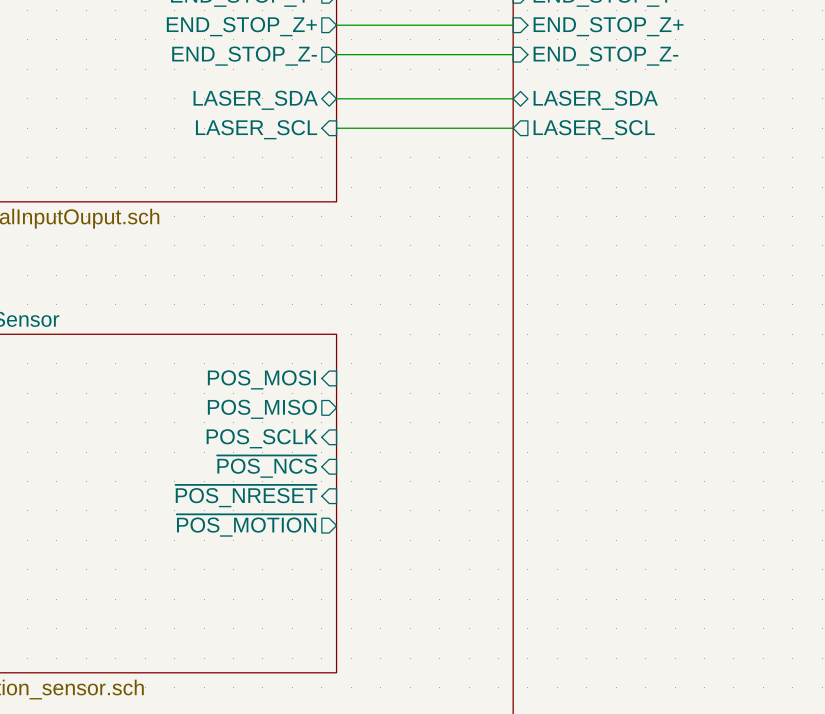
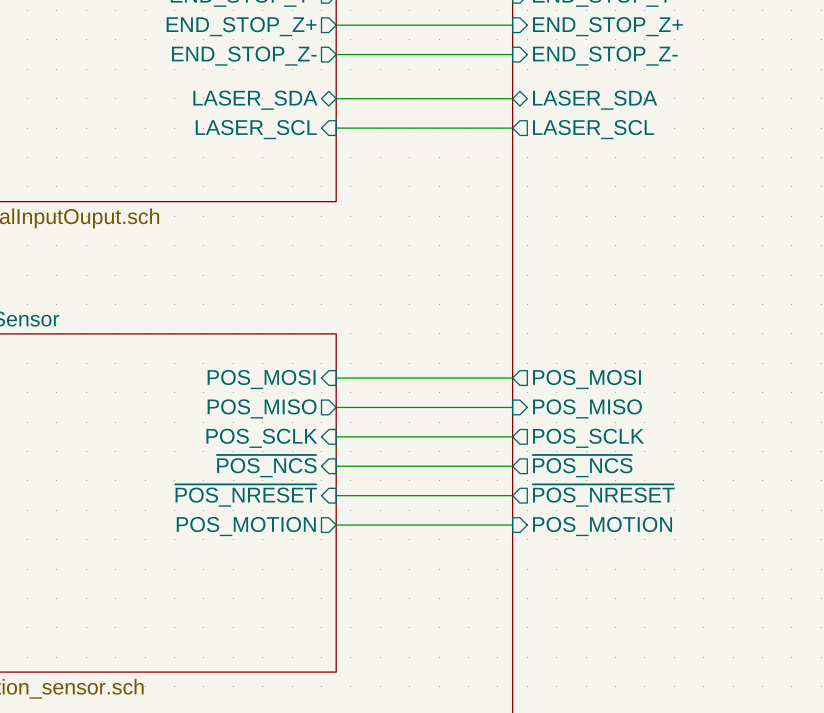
wire: none -> (336, 378) (512, 378)
sheet pin: none -> POS_MOSI (586, 379)
wire: none -> (336, 407) (512, 407)
sheet pin: none -> POS_MISO (587, 408)
wire: none -> (336, 436) (512, 436)
sheet pin: none -> POS_SCLK (588, 438)
wire: none -> (336, 466) (512, 466)
sheet pin: none -> ~{POS_NCS} (582, 466)
wire: none -> (336, 495) (512, 495)
sheet pin: none -> ~{POS_NRESET} (603, 495)
sheet pin: ~{POS_MOTION} (246, 525) -> POS_MOTION (246, 526)
wire: none -> (336, 525) (512, 525)
sheet pin: none -> POS_MOTION (602, 526)

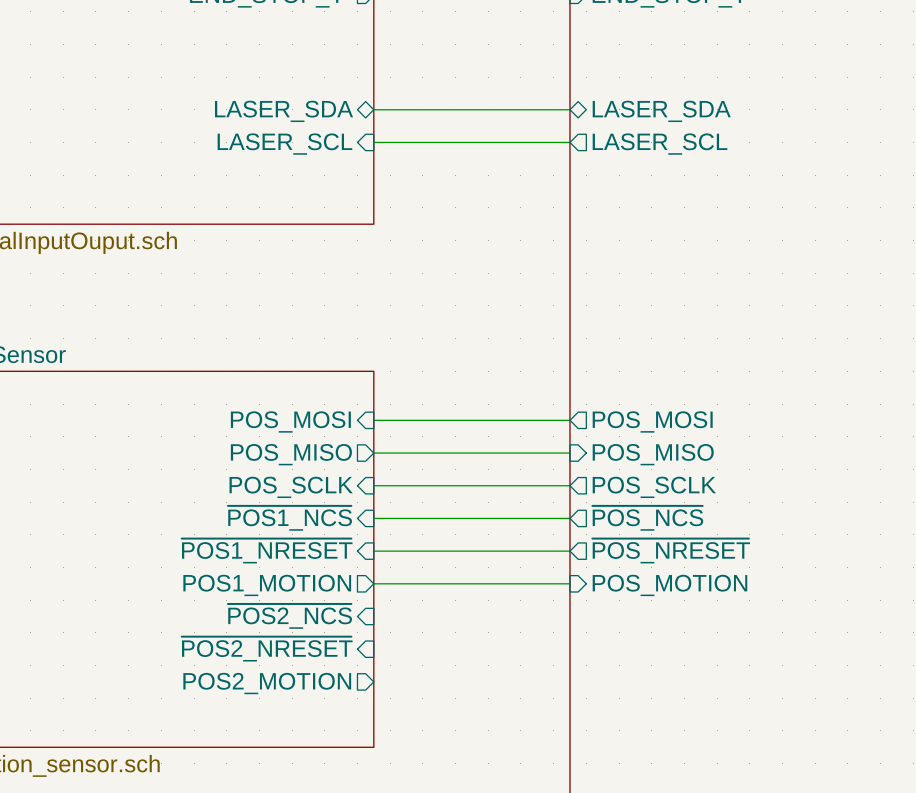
wire: (336, 25) (512, 25) -> none
sheet pin: END_STOP_Z+ (241, 26) -> none
sheet pin: END_STOP_Z+ (607, 26) -> none
wire: (336, 54) (512, 54) -> none
sheet pin: END_STOP_Z- (244, 56) -> none
sheet pin: END_STOP_Z- (605, 56) -> none
sheet pin: ~{POS_NCS} (266, 466) -> ~{POS1_NCS} (289, 518)
sheet pin: ~{POS_NRESET} (246, 495) -> ~{POS1_NRESET} (267, 550)
sheet pin: POS_MOTION (246, 526) -> POS1_MOTION (267, 585)
sheet pin: none -> ~{POS2_NCS} (289, 616)
sheet pin: none -> ~{POS2_NRESET} (267, 649)
sheet pin: none -> POS2_MOTION (267, 683)

